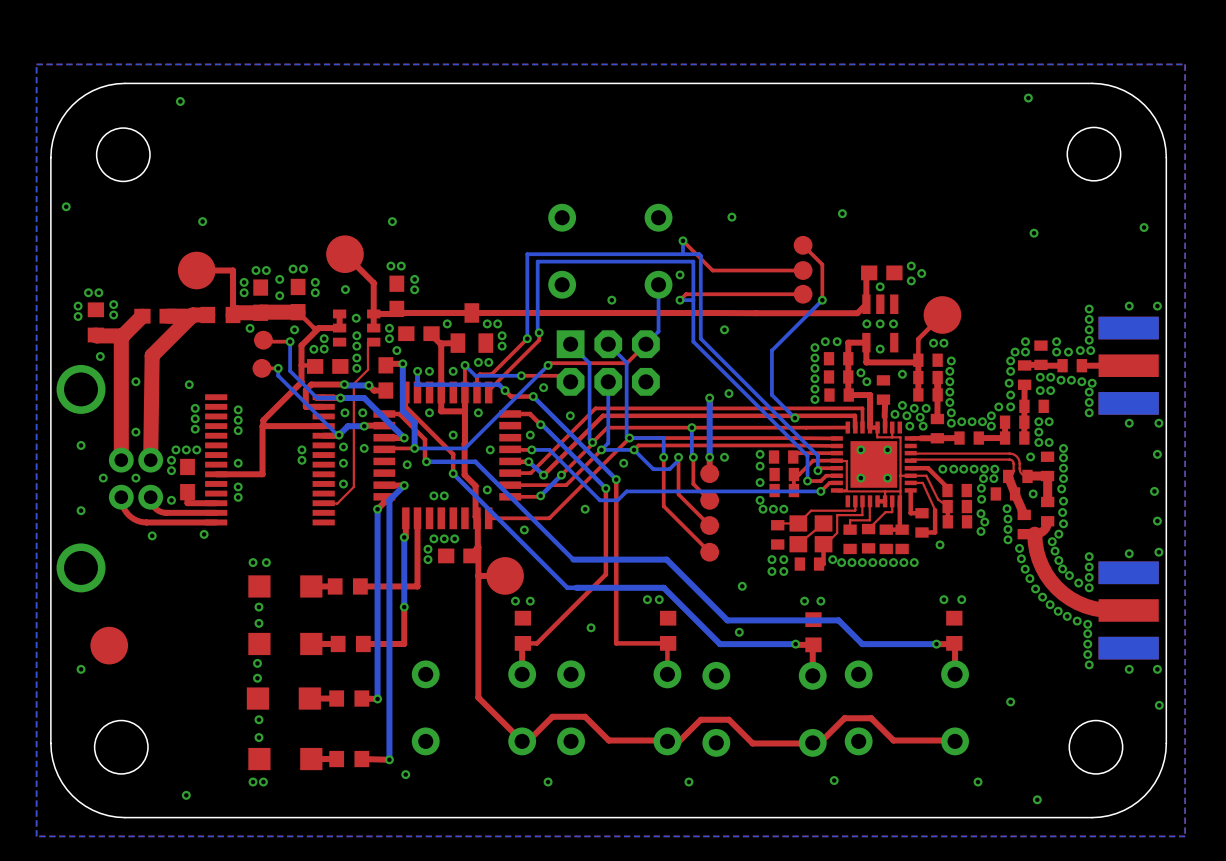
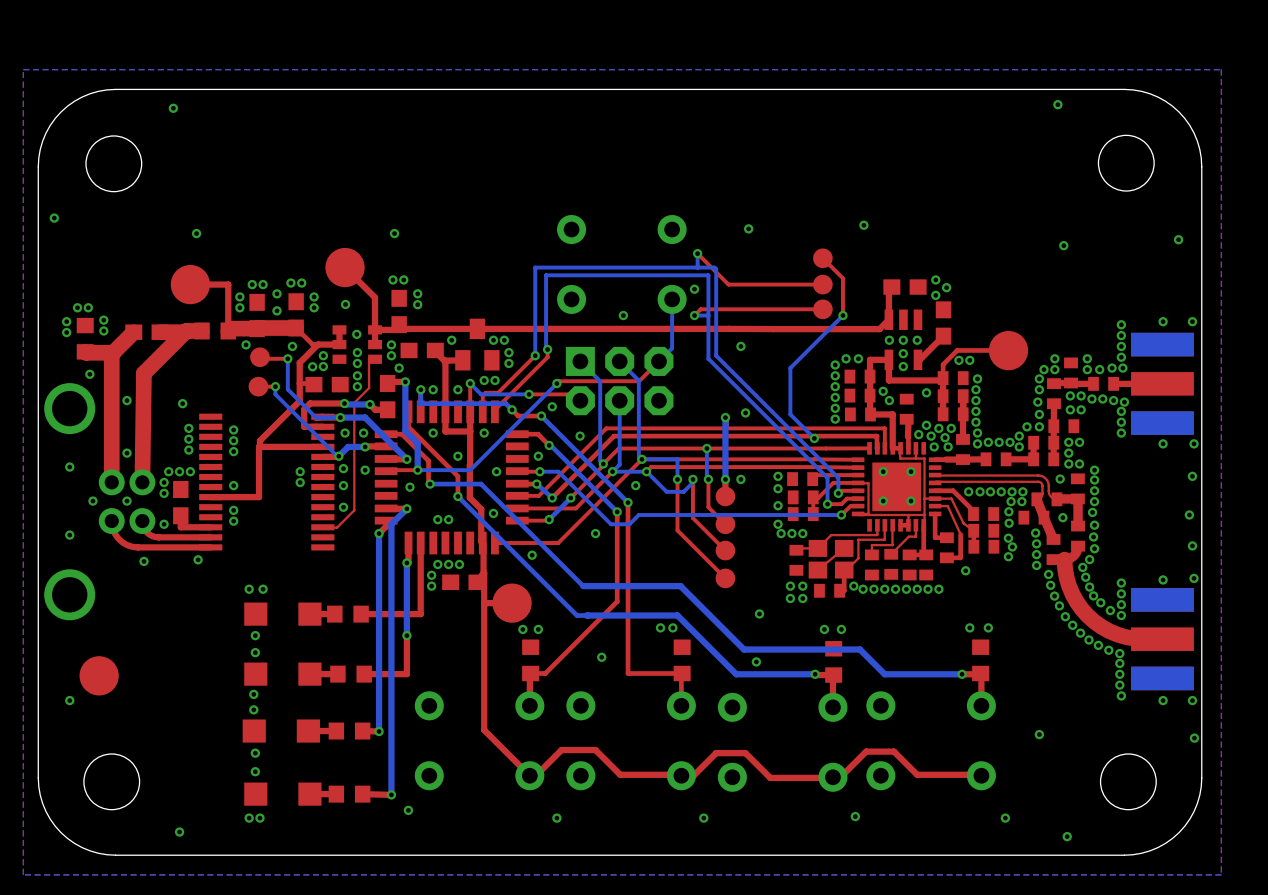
via position: (880, 286) -> (903, 353)
part: none -> (943, 322)
top track: (942, 314) (918, 339) (918, 347) -> (1008, 350) (957, 350) (943, 364)
part position: (942, 314) -> (1008, 350)
top track: none -> (943, 336) (917, 359)

